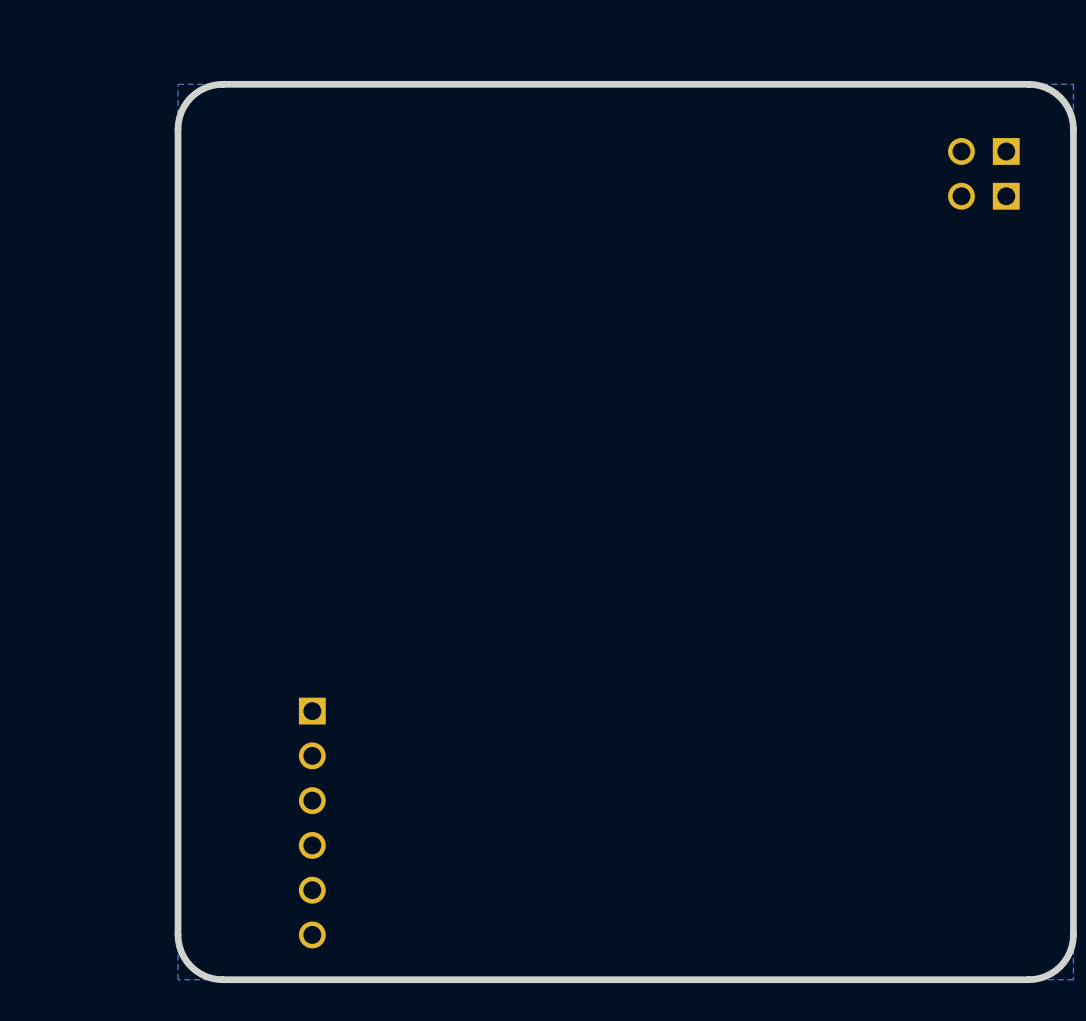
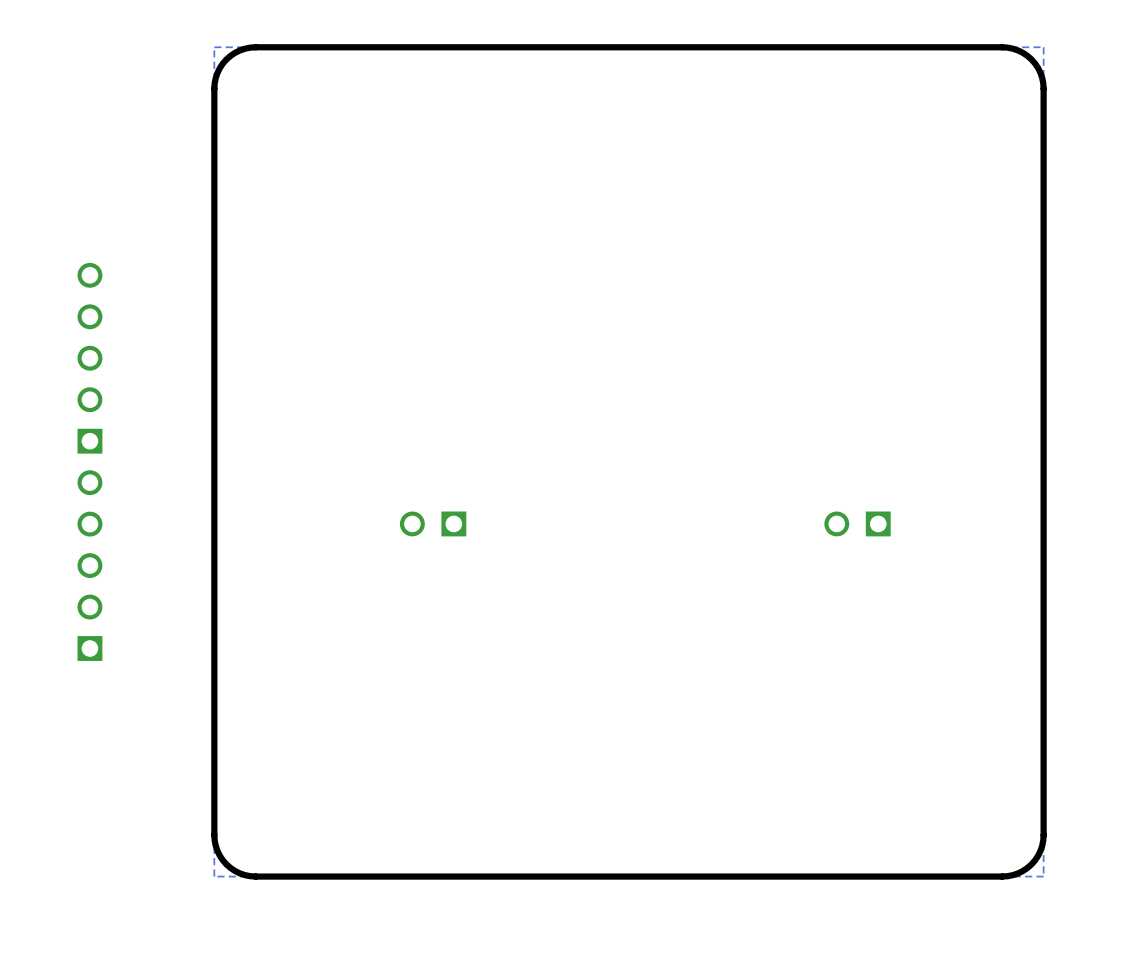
part: (983, 151) -> none
part: (983, 196) -> none
part: none -> (89, 358)
part: none -> (433, 523)
part: none -> (857, 523)
part: none -> (89, 565)
part: (312, 823) -> none

